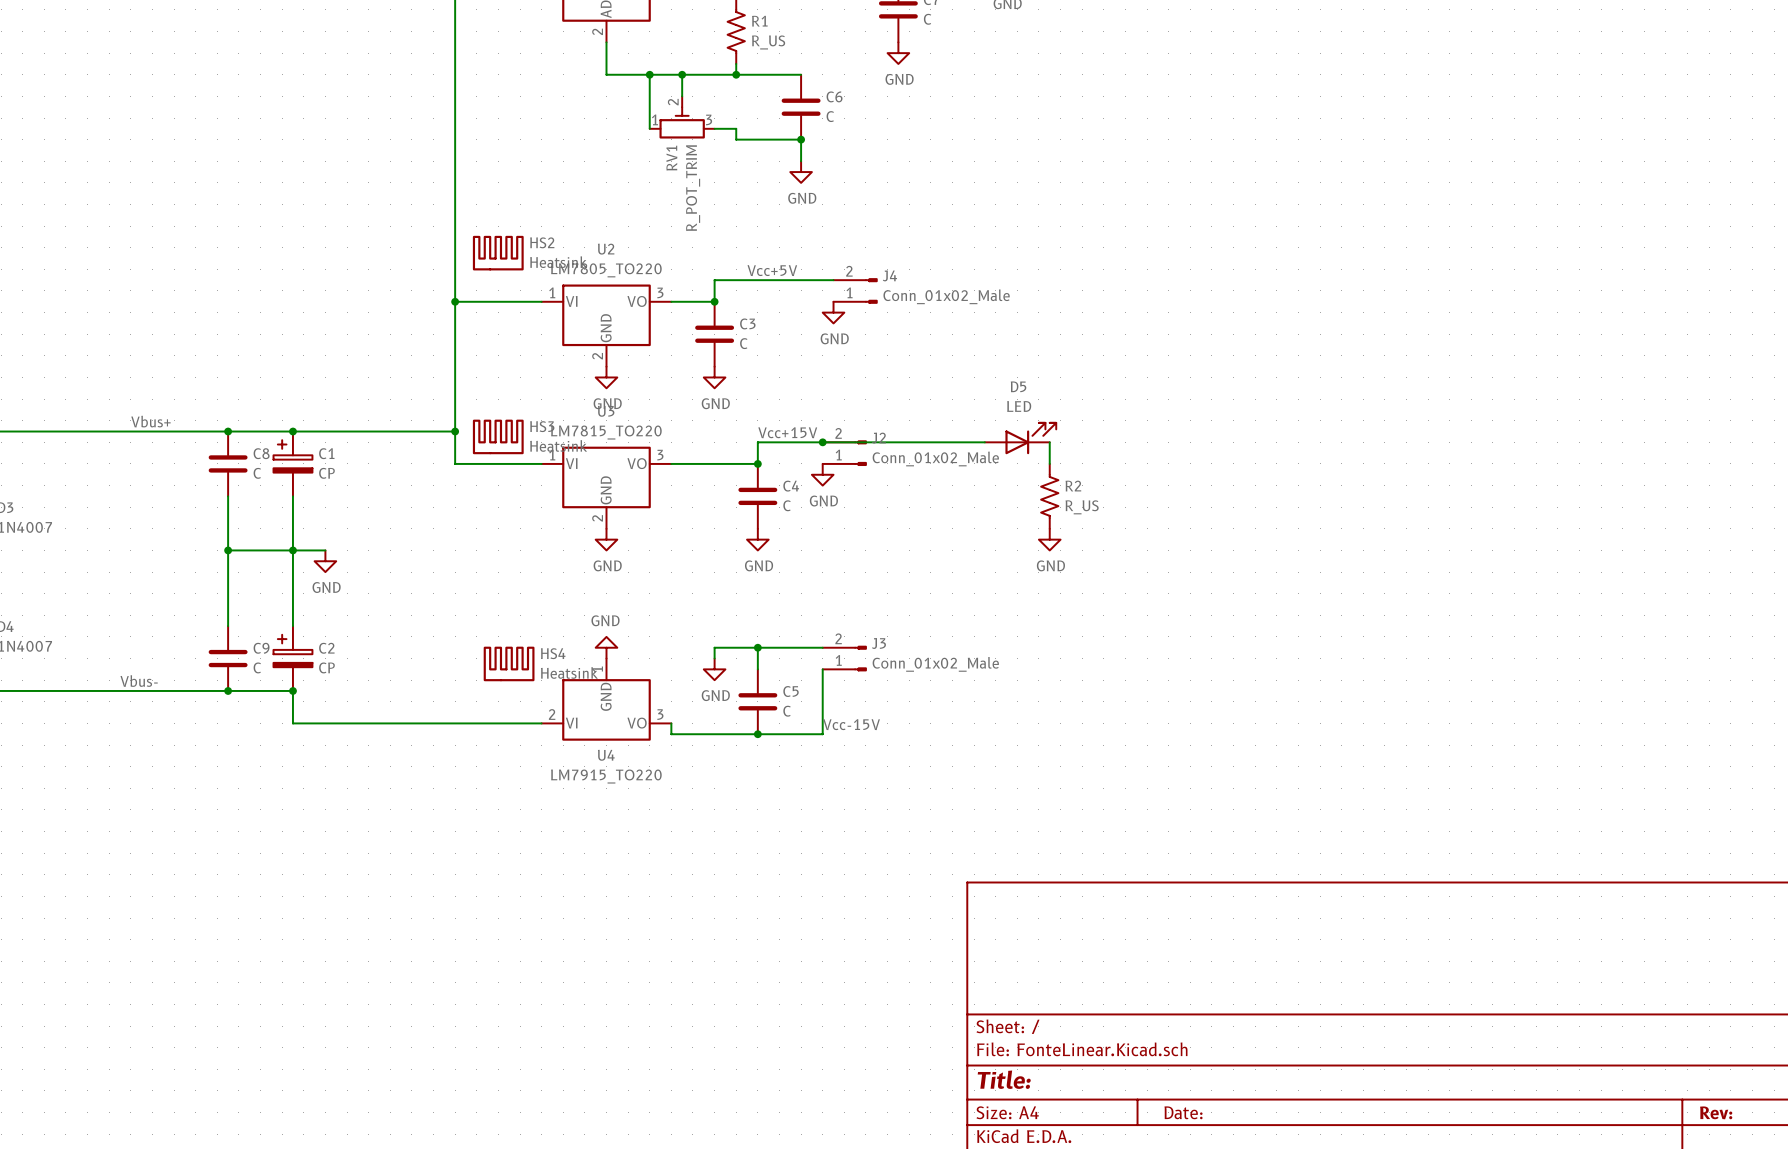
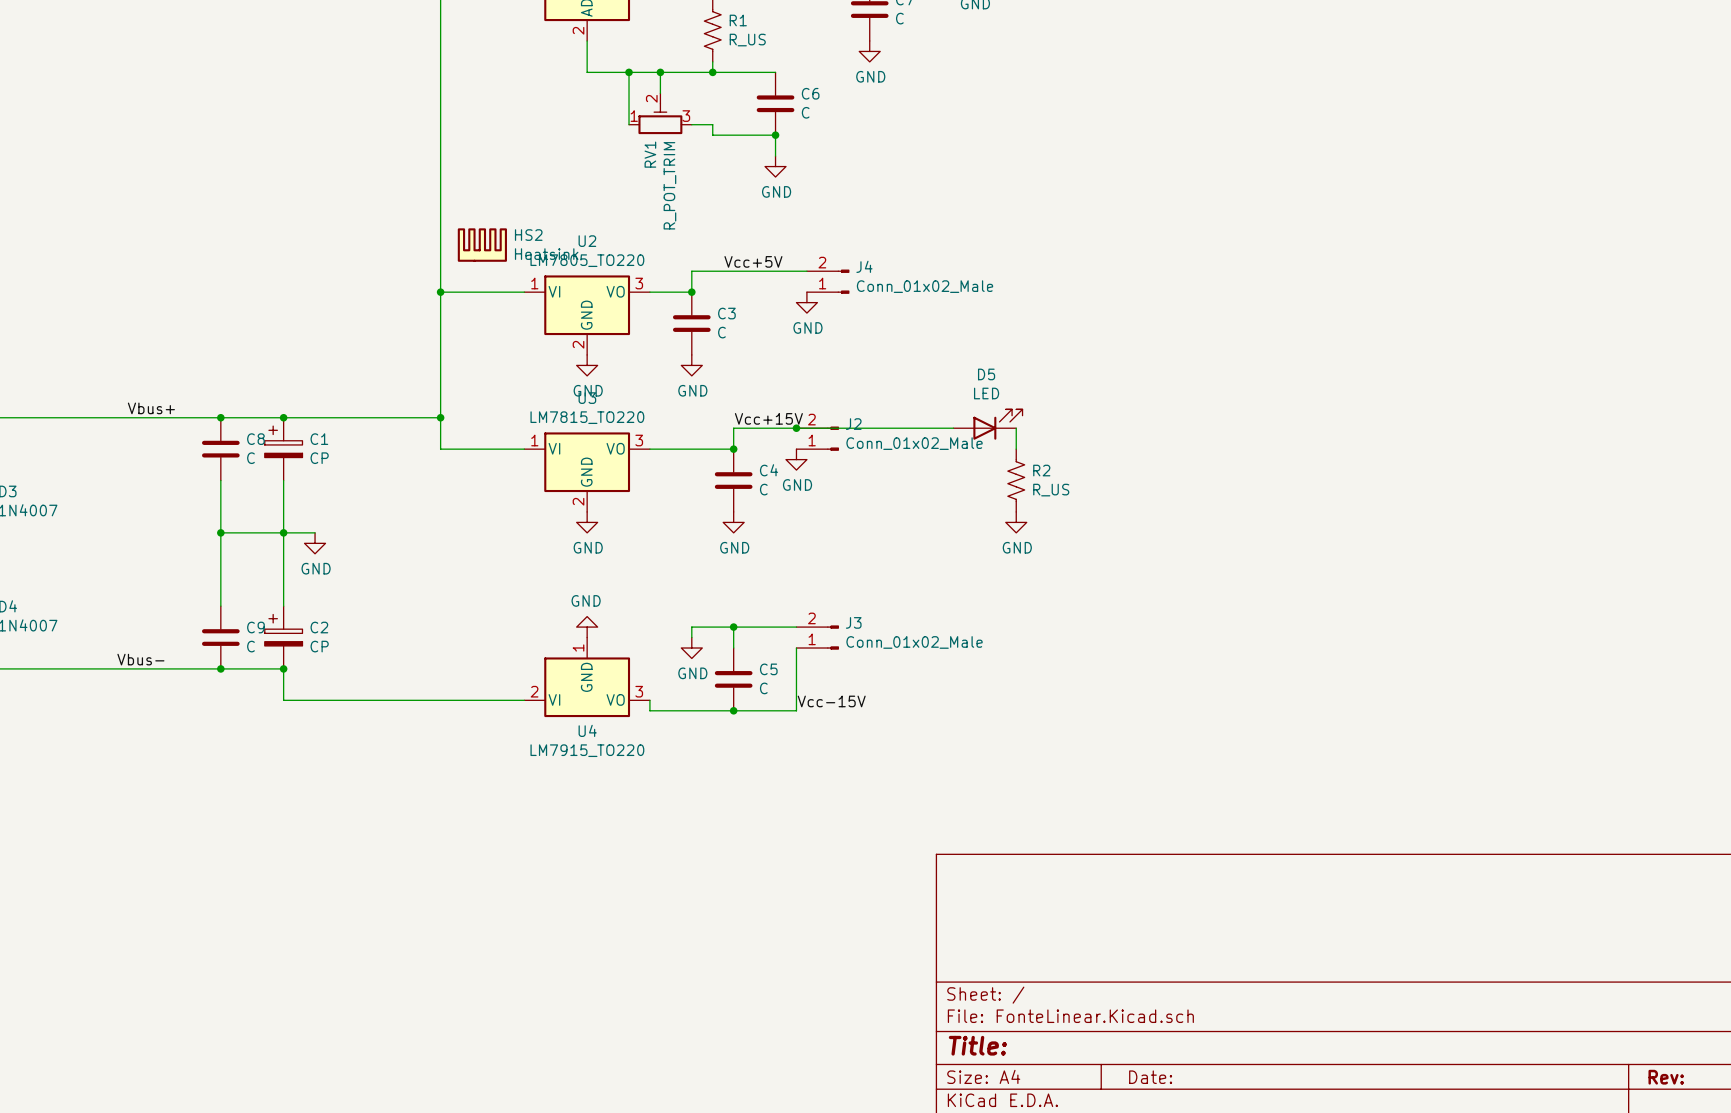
HS3: Heatsink (498, 436) -> none
HS4: Heatsink (509, 663) -> none

